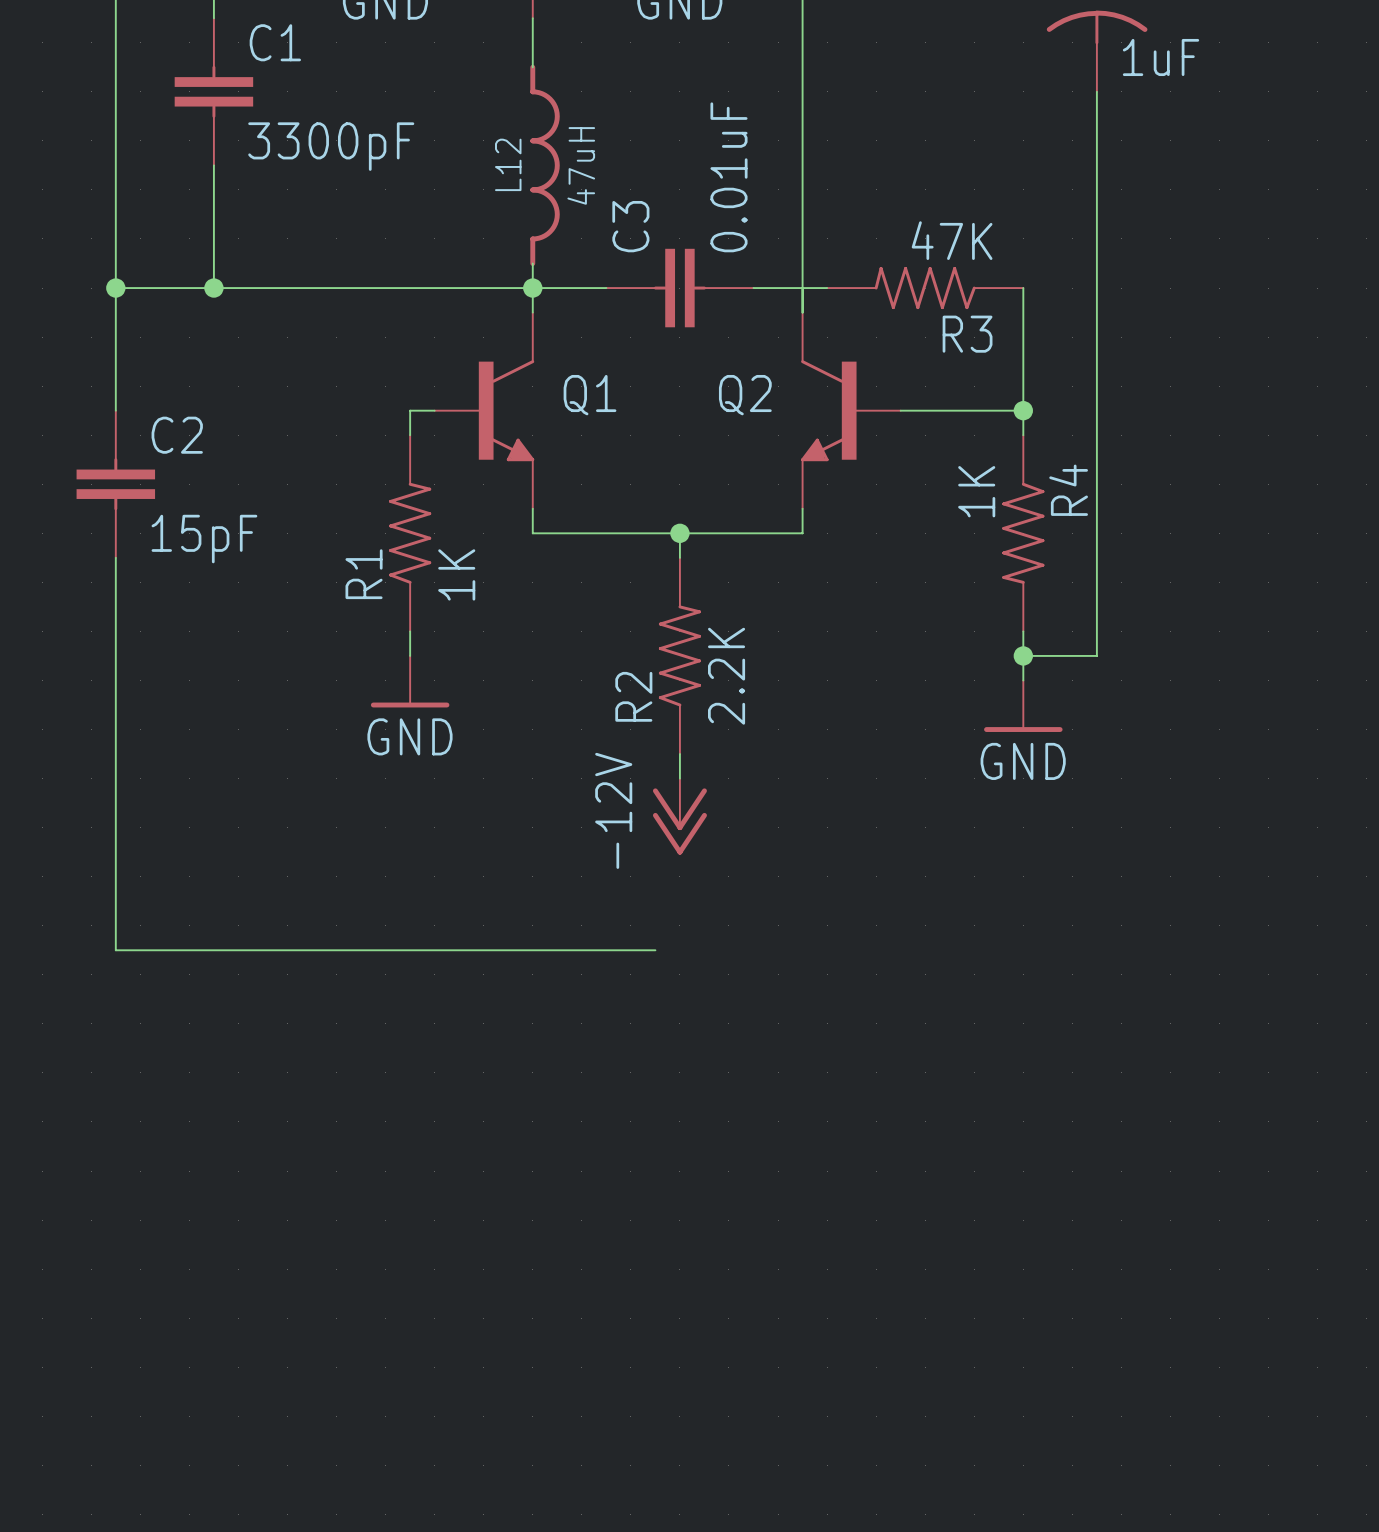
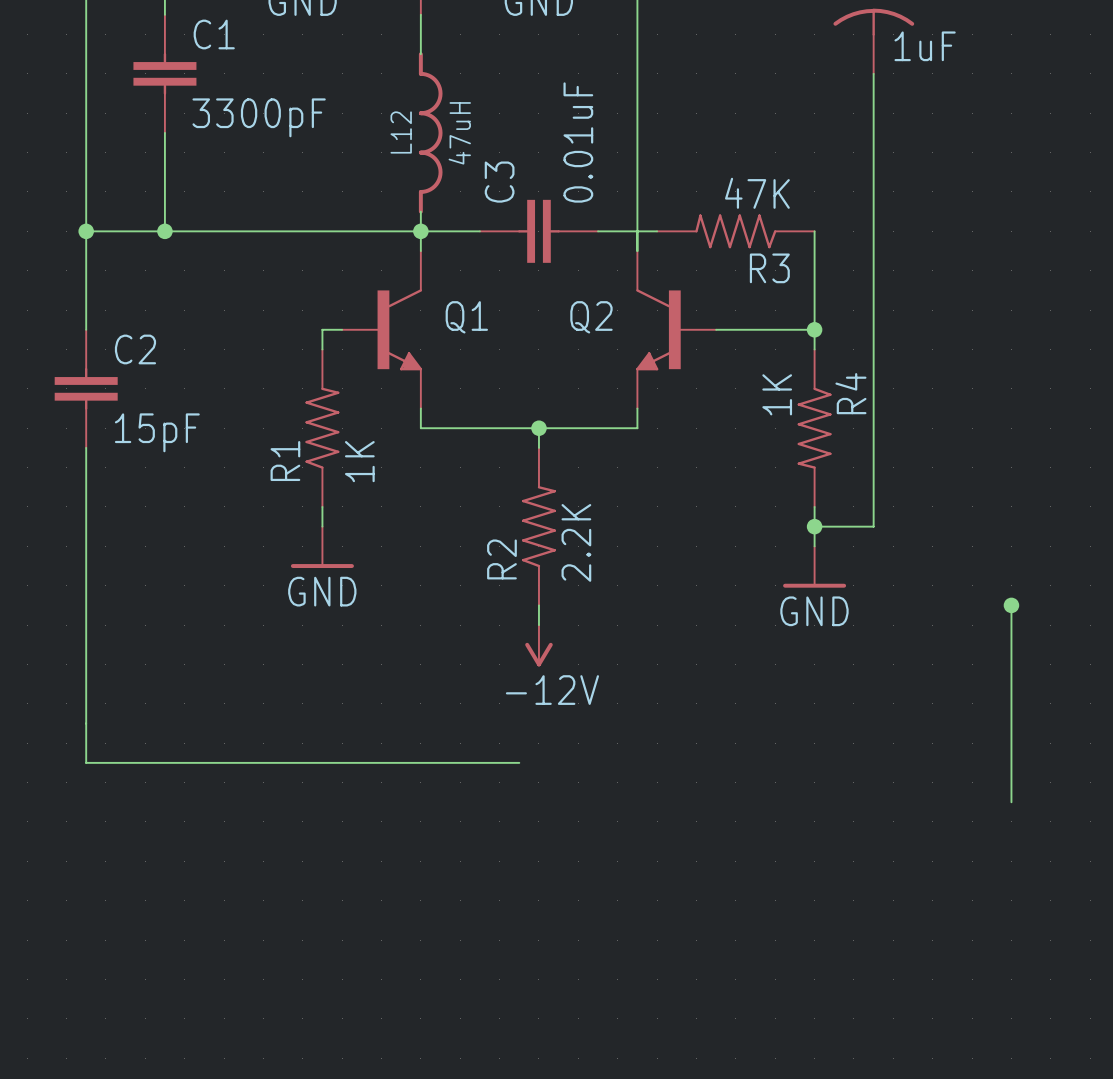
wire: none -> (1011, 605) (1011, 802)
junction: none -> (1011, 605)
power symbol shape: [652, 778, 707, 855] -> [525, 625, 553, 667]
power symbol text position: -12V (613, 810) -> -12V (552, 690)

